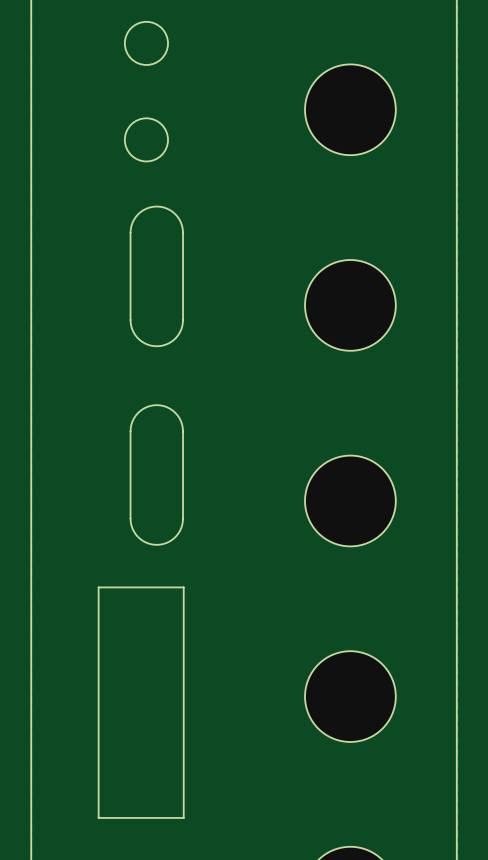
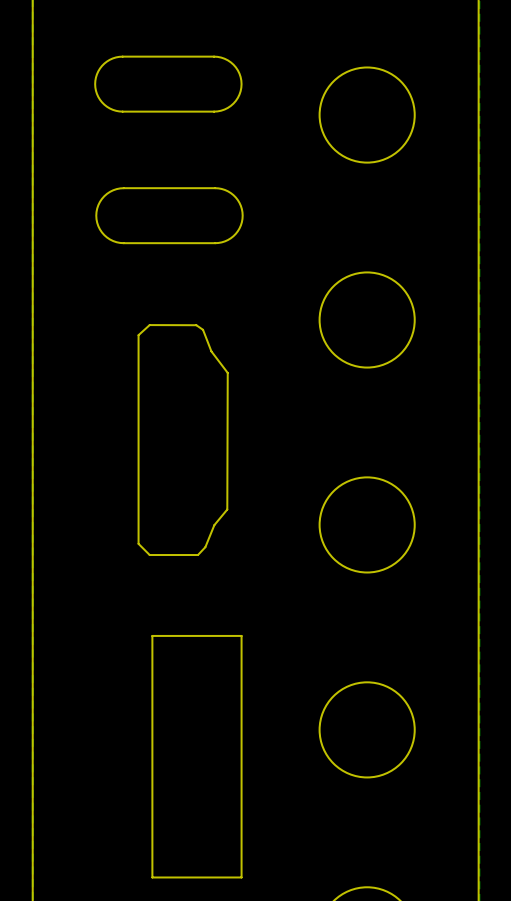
round board edge: [124, 21, 169, 66] -> none
board edge: none -> (214, 56) (116, 57) (104, 63) (98, 71) (95, 80) (95, 90) (104, 104) (119, 111) (221, 110) (235, 100) (240, 91) (241, 80) (237, 70) (230, 62) (214, 56)
round board edge: [124, 117, 169, 163] -> none
board edge: none -> (215, 188) (116, 189) (107, 193) (99, 201) (96, 212) (97, 222) (107, 237) (120, 242) (221, 242) (230, 238) (237, 231) (241, 222) (242, 212) (239, 202) (233, 195) (224, 189) (215, 188)
board edge: (183, 232) (182, 326) (178, 334) (171, 341) (159, 346) (150, 345) (137, 337) (130, 323) (131, 225) (140, 211) (149, 207) (160, 206) (169, 210) (177, 216) (183, 232) -> none
board edge: none -> (149, 325) (138, 335) (138, 543) (149, 555) (198, 555) (205, 547) (214, 525) (227, 509) (227, 372) (211, 351) (203, 329) (196, 325) (149, 325)
board edge: (183, 431) (182, 524) (178, 533) (168, 541) (159, 544) (150, 544) (137, 536) (130, 521) (131, 424) (135, 415) (143, 408) (160, 405) (169, 408) (177, 415) (183, 431) -> none
board edge: (183, 587) (98, 587) (98, 817) (183, 817) (183, 587) -> (241, 635) (152, 635) (152, 877) (241, 877) (241, 635)

